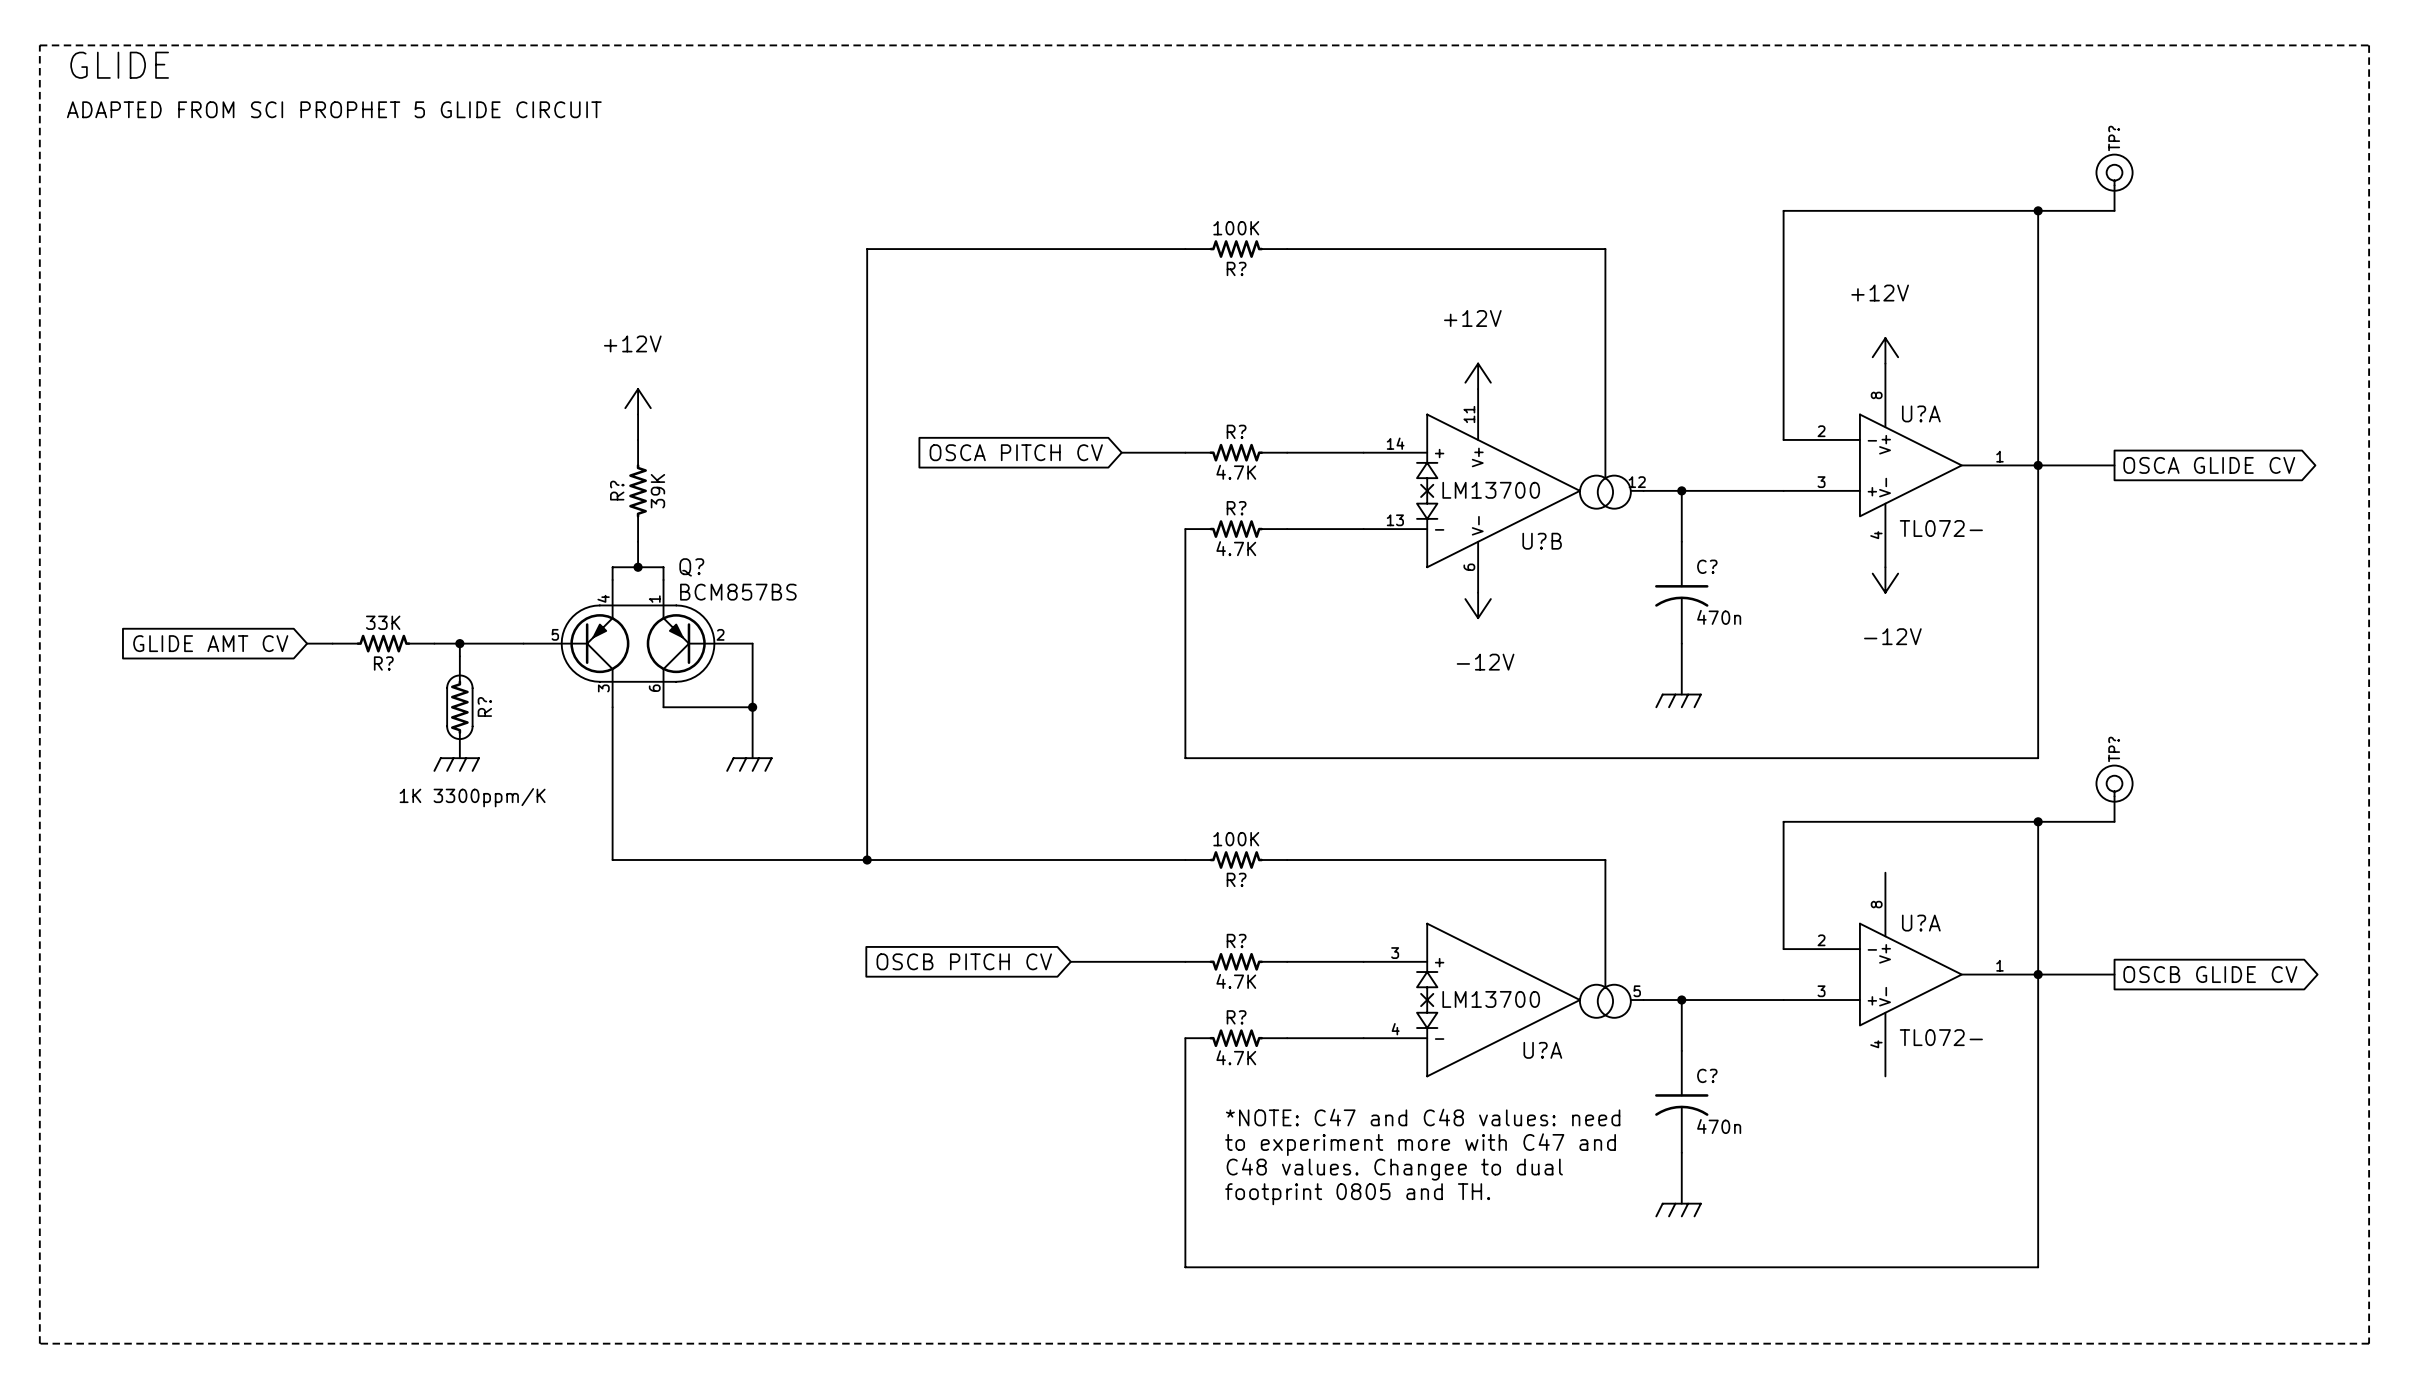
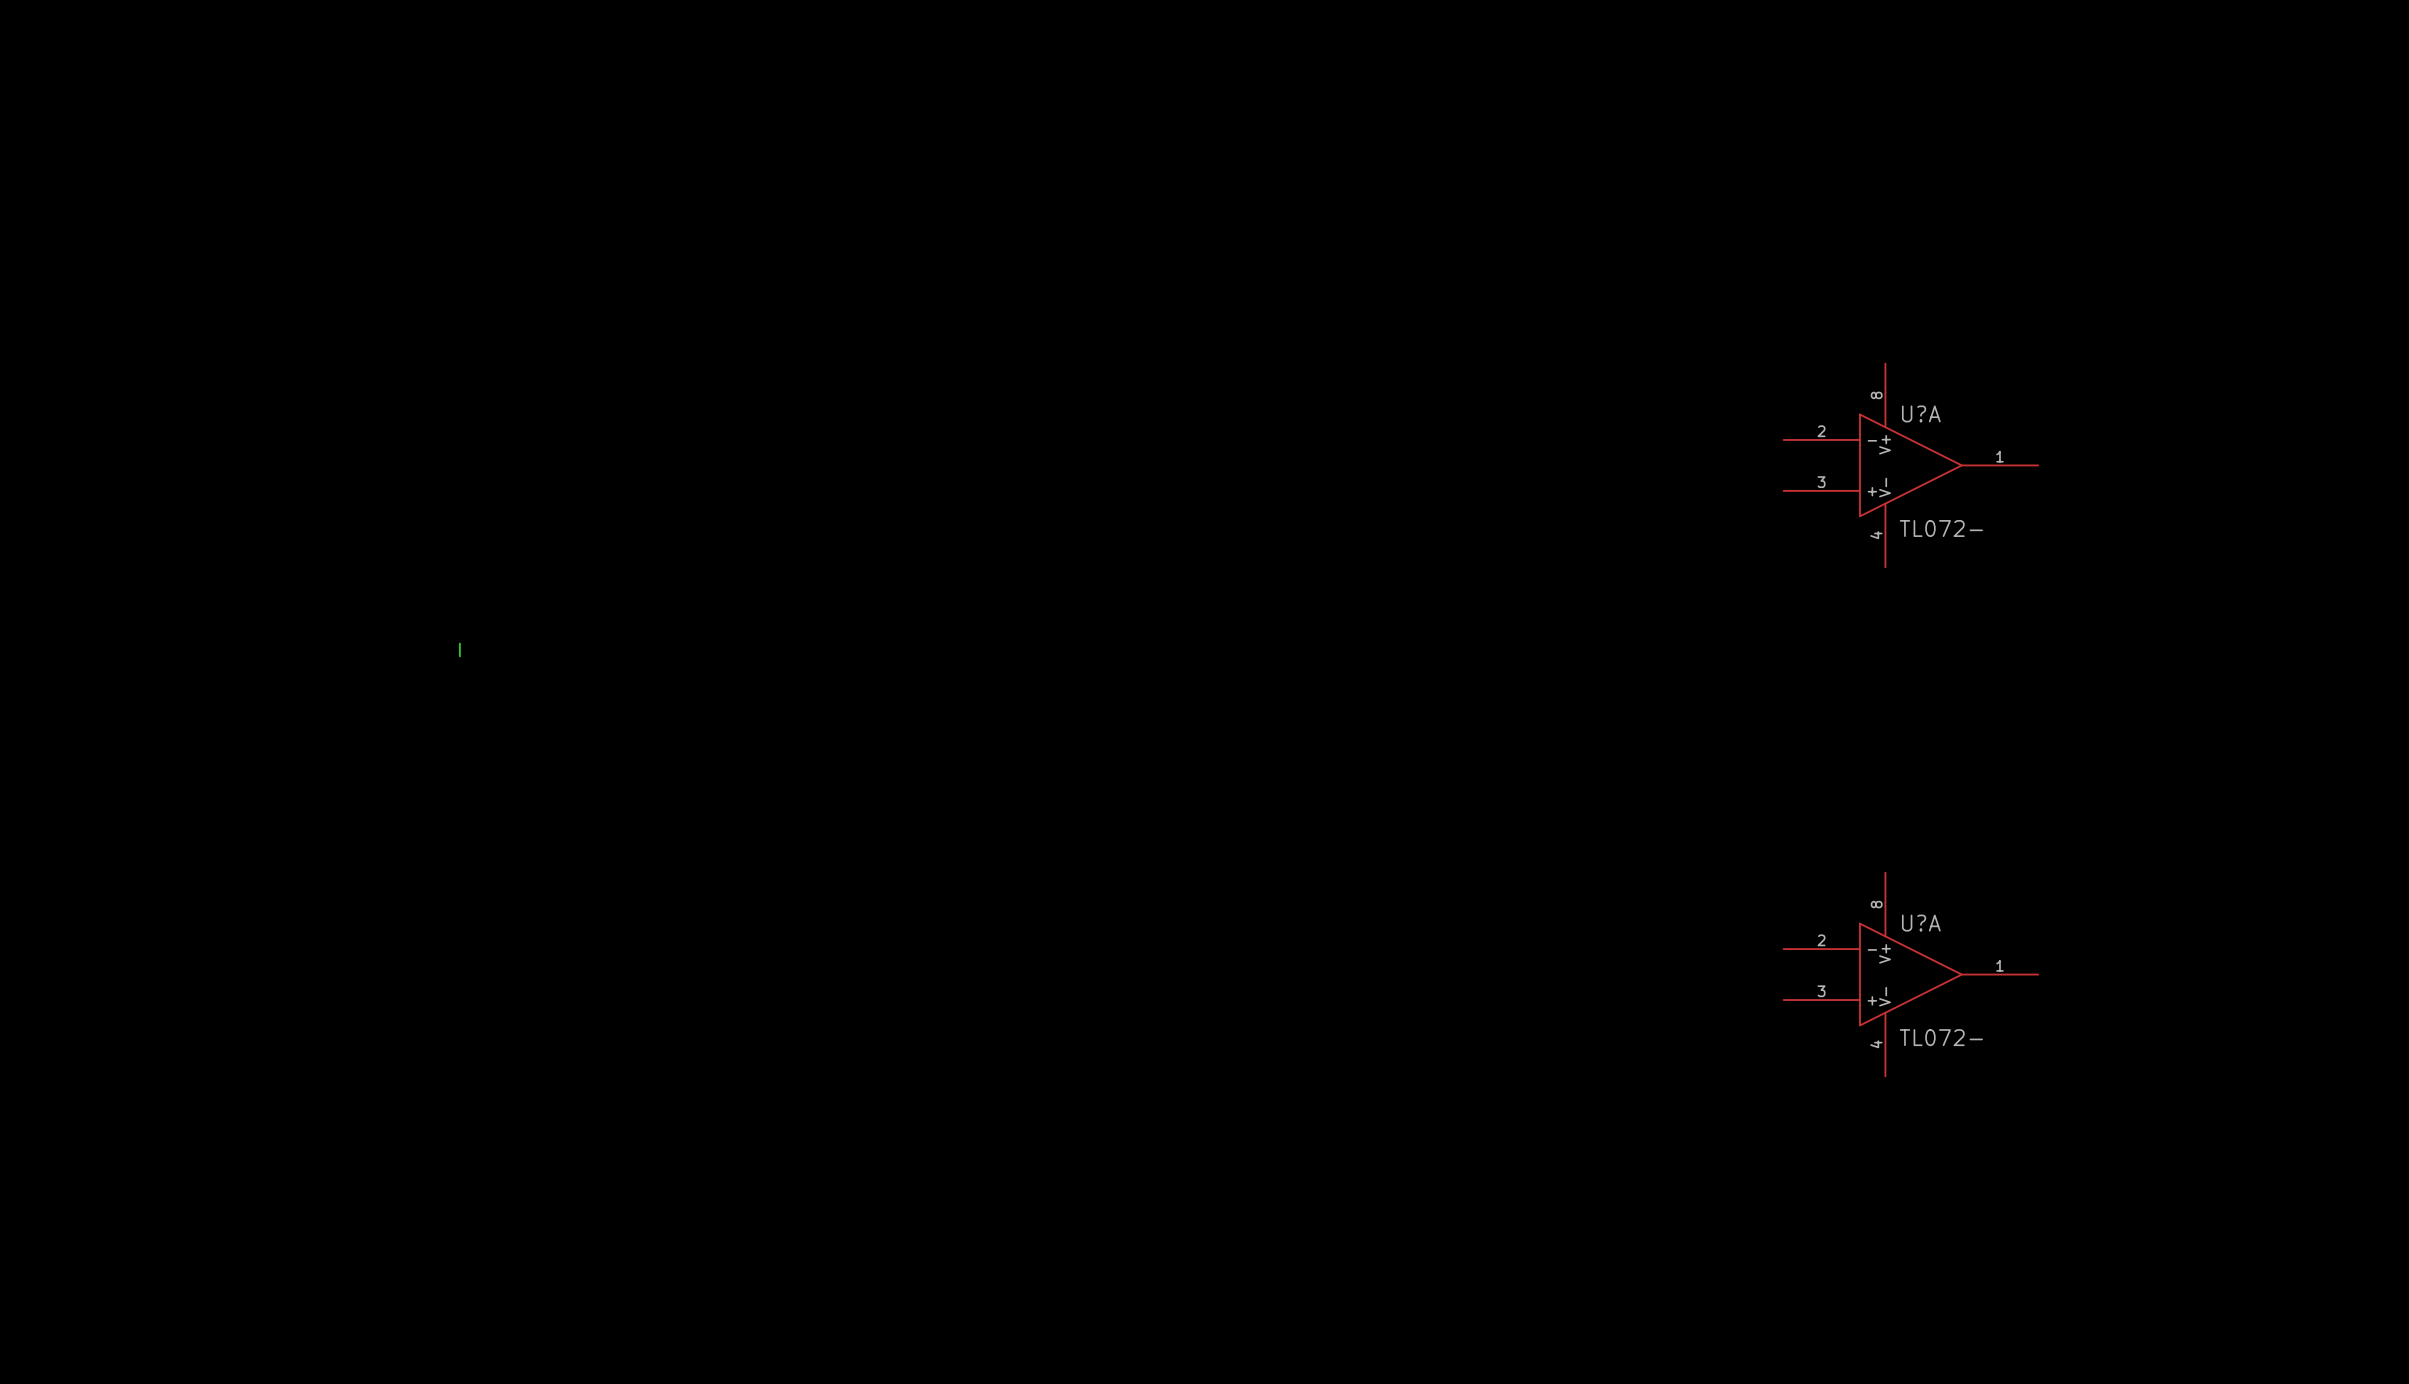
line: (39, 45) (2369, 45) (2369, 1343) (39, 1343) (39, 45) -> none
text: GLIDE (119, 65) -> none
text: ADAPTED FROM SCI PROPHET 5 GLIDE CIRCUIT (334, 109) -> none
TP?: (2114, 182) -> none
wire: (2038, 210) (2038, 758) (1185, 758) (1185, 529) -> none
junction: (2038, 210) -> none
wire: (2114, 210) (1783, 210) (1783, 439) -> none
wire: (1185, 249) (867, 249) (867, 860) -> none
R?: 100K (1236, 249) -> none
wire: (1287, 249) (1605, 249) (1605, 478) -> none
power symbol: +12V (1885, 350) -> none
power symbol: +12V (1478, 376) -> none
power symbol: +12V (638, 401) -> none
wire: (638, 414) (638, 439) -> none
global label: OSCA PITCH CV (1016, 452) -> none
wire: (1121, 452) (1185, 452) -> none
R?: 4.7K (1236, 452) -> none
wire: (1287, 452) (1363, 452) -> none
wire: (2038, 465) (2114, 465) -> none
junction: (2038, 465) -> none
global label: OSCA GLIDE CV (2209, 465) -> none
R?: 39K (638, 490) -> none
no-connect mark: (1427, 490) -> none
U?B: LM13700 (1503, 490) -> none
wire: (1643, 490) (1783, 490) -> none
wire: (1681, 490) (1681, 541) -> none
junction: (1681, 490) -> none
R?: 4.7K (1236, 529) -> none
wire: (1287, 529) (1363, 529) -> none
wire: (638, 541) (638, 567) -> none
junction: (638, 567) -> none
wire: (612, 579) (612, 567) (663, 567) (663, 579) -> none
power symbol: -12V (1885, 579) -> none
C?: 470n (1681, 592) -> none
power symbol: -12V (1478, 605) -> none
global label: GLIDE AMT CV (210, 643) -> none
wire: (307, 643) (332, 643) -> none
R?: 33K (383, 643) -> none
wire: (434, 643) (523, 643) -> none
junction: (459, 643) -> none
Q?: BCM857BS (638, 643) -> none
wire: (752, 643) (752, 758) -> none
wire: (1681, 643) (1681, 694) -> none
power symbol: (1678, 700) -> none
R?: 1K 3300ppm/K (459, 707) -> none
wire: (612, 707) (612, 860) (1185, 860) -> none
wire: (663, 707) (752, 707) -> none
junction: (752, 707) -> none
power symbol: (456, 764) -> none
power symbol: (749, 764) -> none
TP?: (2114, 793) -> none
wire: (2038, 821) (2038, 1267) (1185, 1267) (1185, 1038) -> none
junction: (2038, 821) -> none
wire: (2114, 821) (1783, 821) (1783, 949) -> none
junction: (867, 860) -> none
R?: 100K (1236, 860) -> none
wire: (1287, 860) (1605, 860) (1605, 987) -> none
global label: OSCB PITCH CV (964, 961) -> none
wire: (1070, 961) (1185, 961) -> none
R?: 4.7K (1236, 961) -> none
wire: (1287, 961) (1363, 961) -> none
wire: (2038, 974) (2114, 974) -> none
junction: (2038, 974) -> none
global label: OSCB GLIDE CV (2210, 974) -> none
no-connect mark: (1427, 1000) -> none
U?A: LM13700 (1503, 1000) -> none
wire: (1643, 1000) (1783, 1000) -> none
wire: (1681, 1000) (1681, 1050) -> none
junction: (1681, 1000) -> none
R?: 4.7K (1236, 1038) -> none
wire: (1287, 1038) (1363, 1038) -> none
C?: 470n (1681, 1101) -> none
text: *NOTE: C47 and C48 values: need (1423, 1117) -> none
text: to experiment more with C47 and (1420, 1144) -> none
wire: (1681, 1152) (1681, 1203) -> none
text: C48 values. Changee to dual (1394, 1169) -> none
text: footprint 0805 and TH. (1357, 1194) -> none
power symbol: (1678, 1210) -> none

